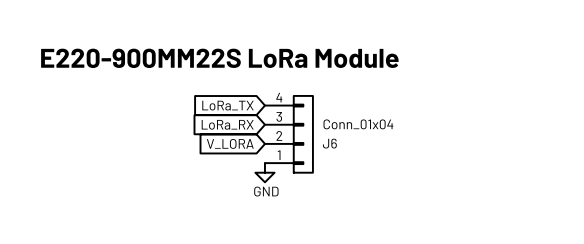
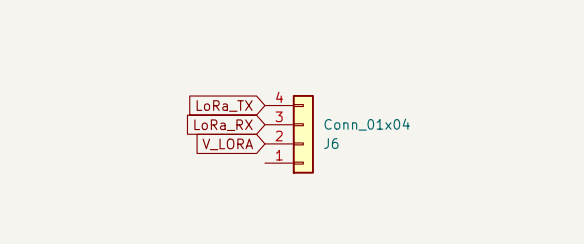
text: E220-900MM22S LoRa Module (219, 58) -> none
power symbol: GND (264, 172) -> none

